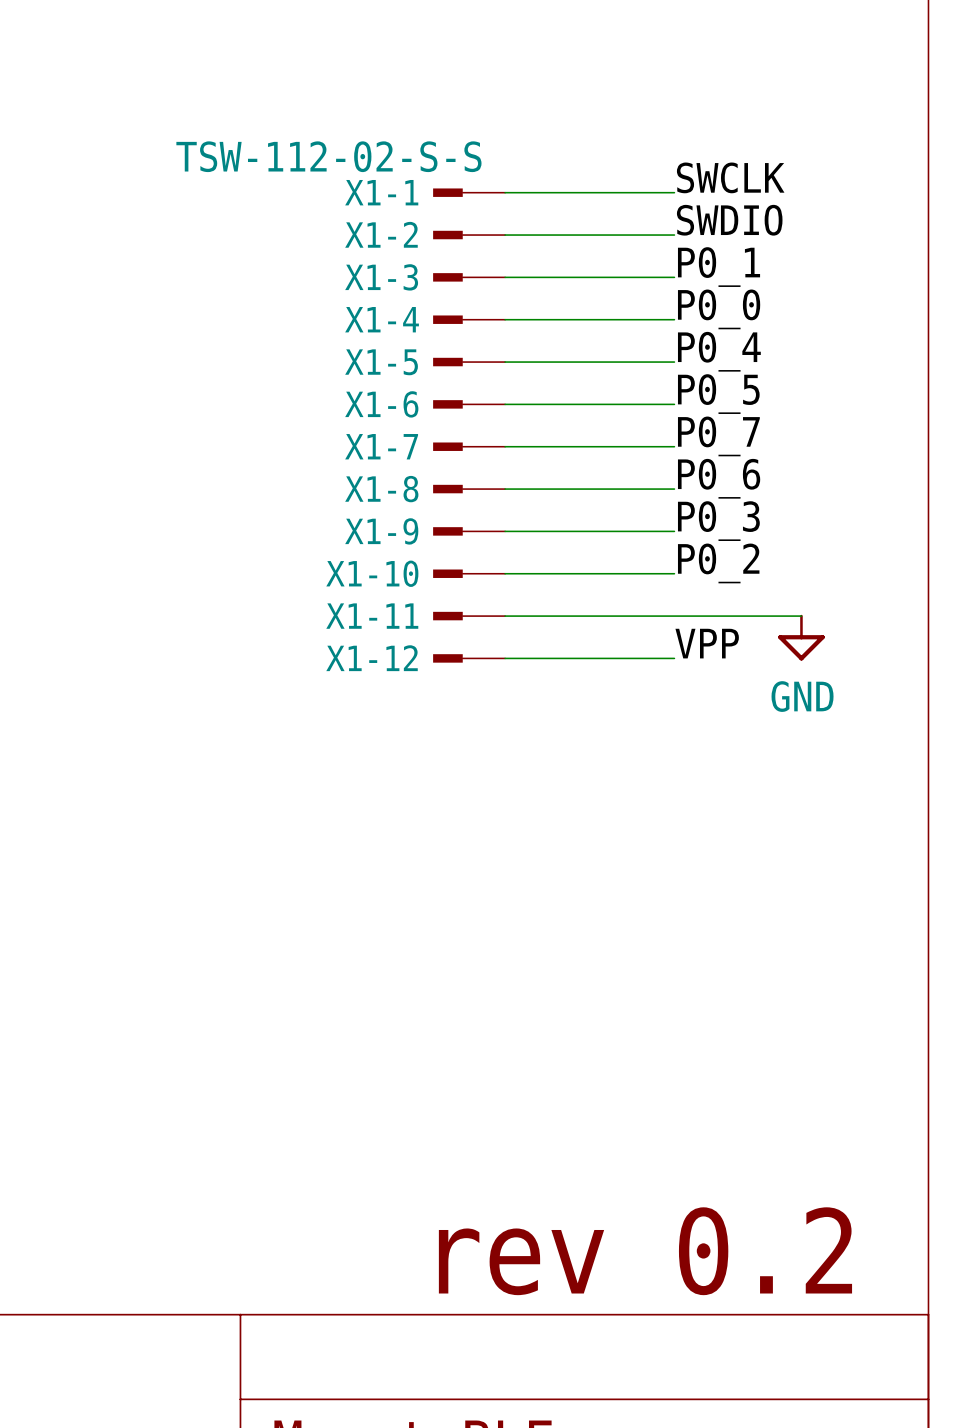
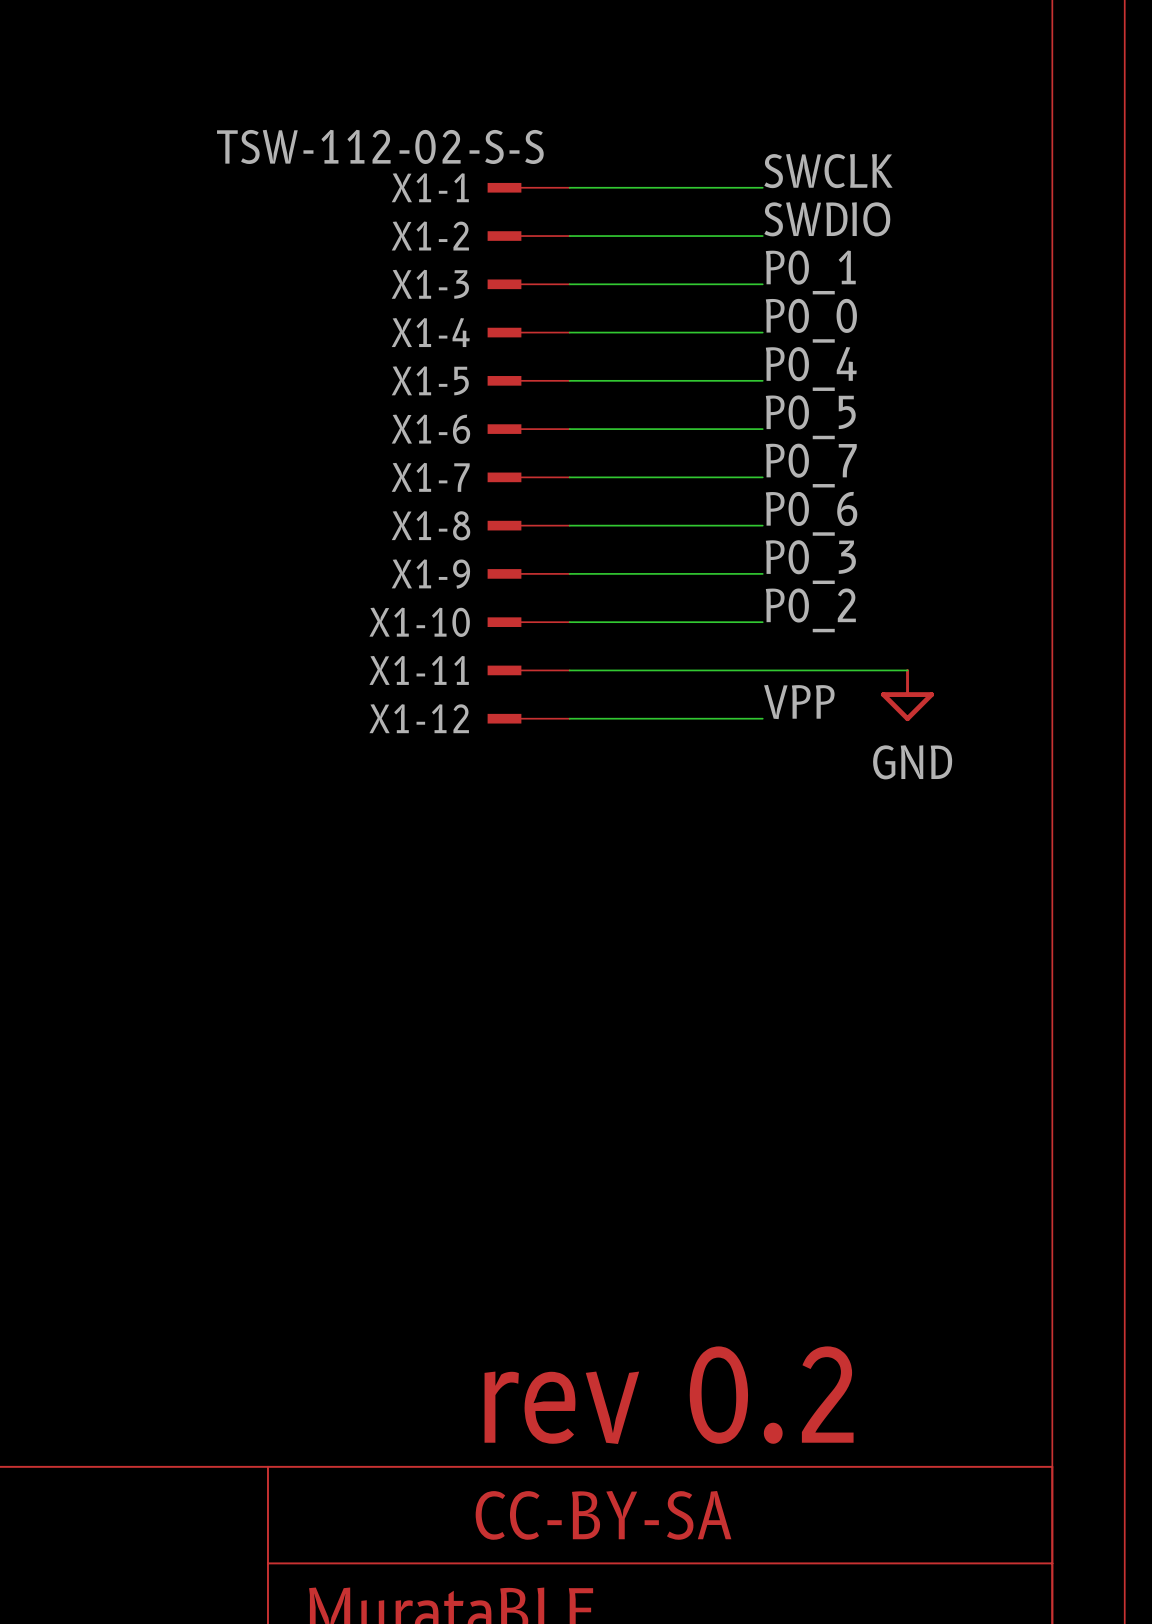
text: none -> CC-BY-SA (603, 1515)

